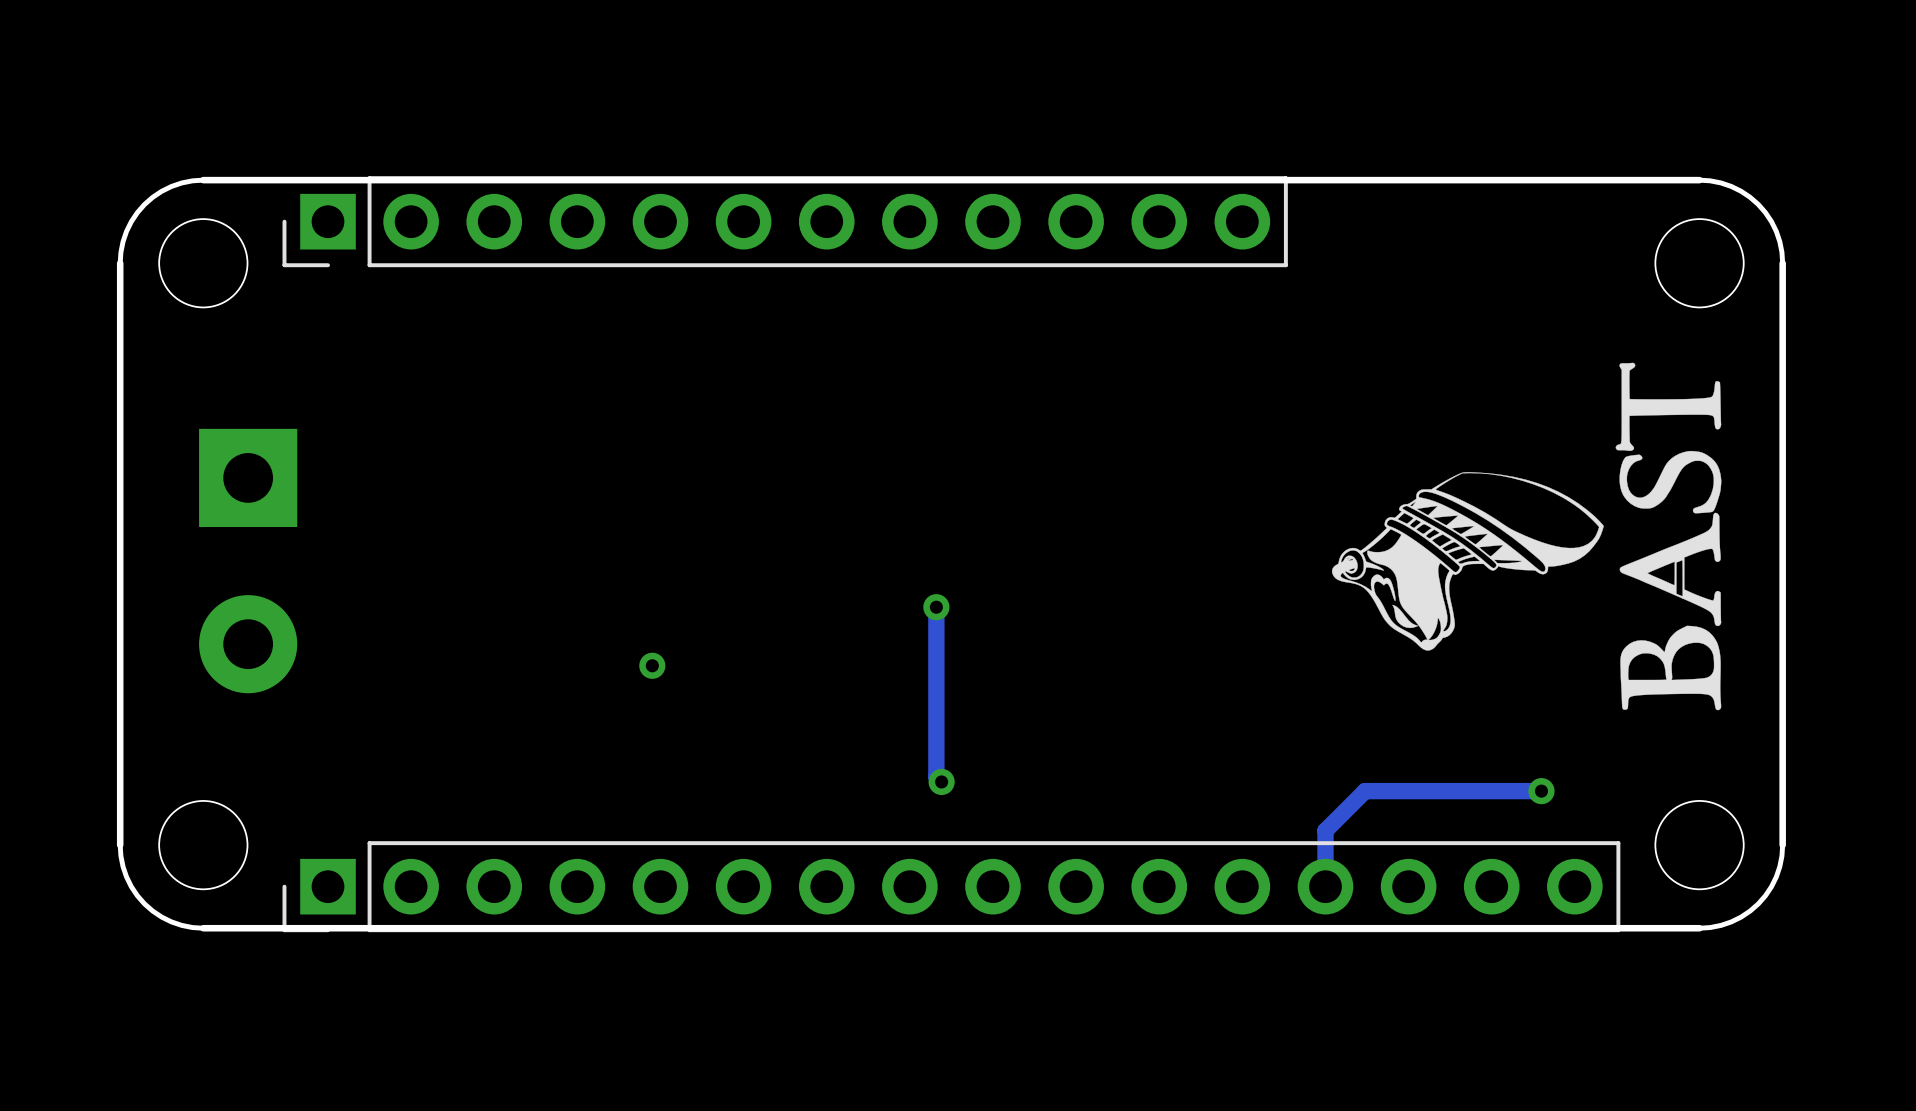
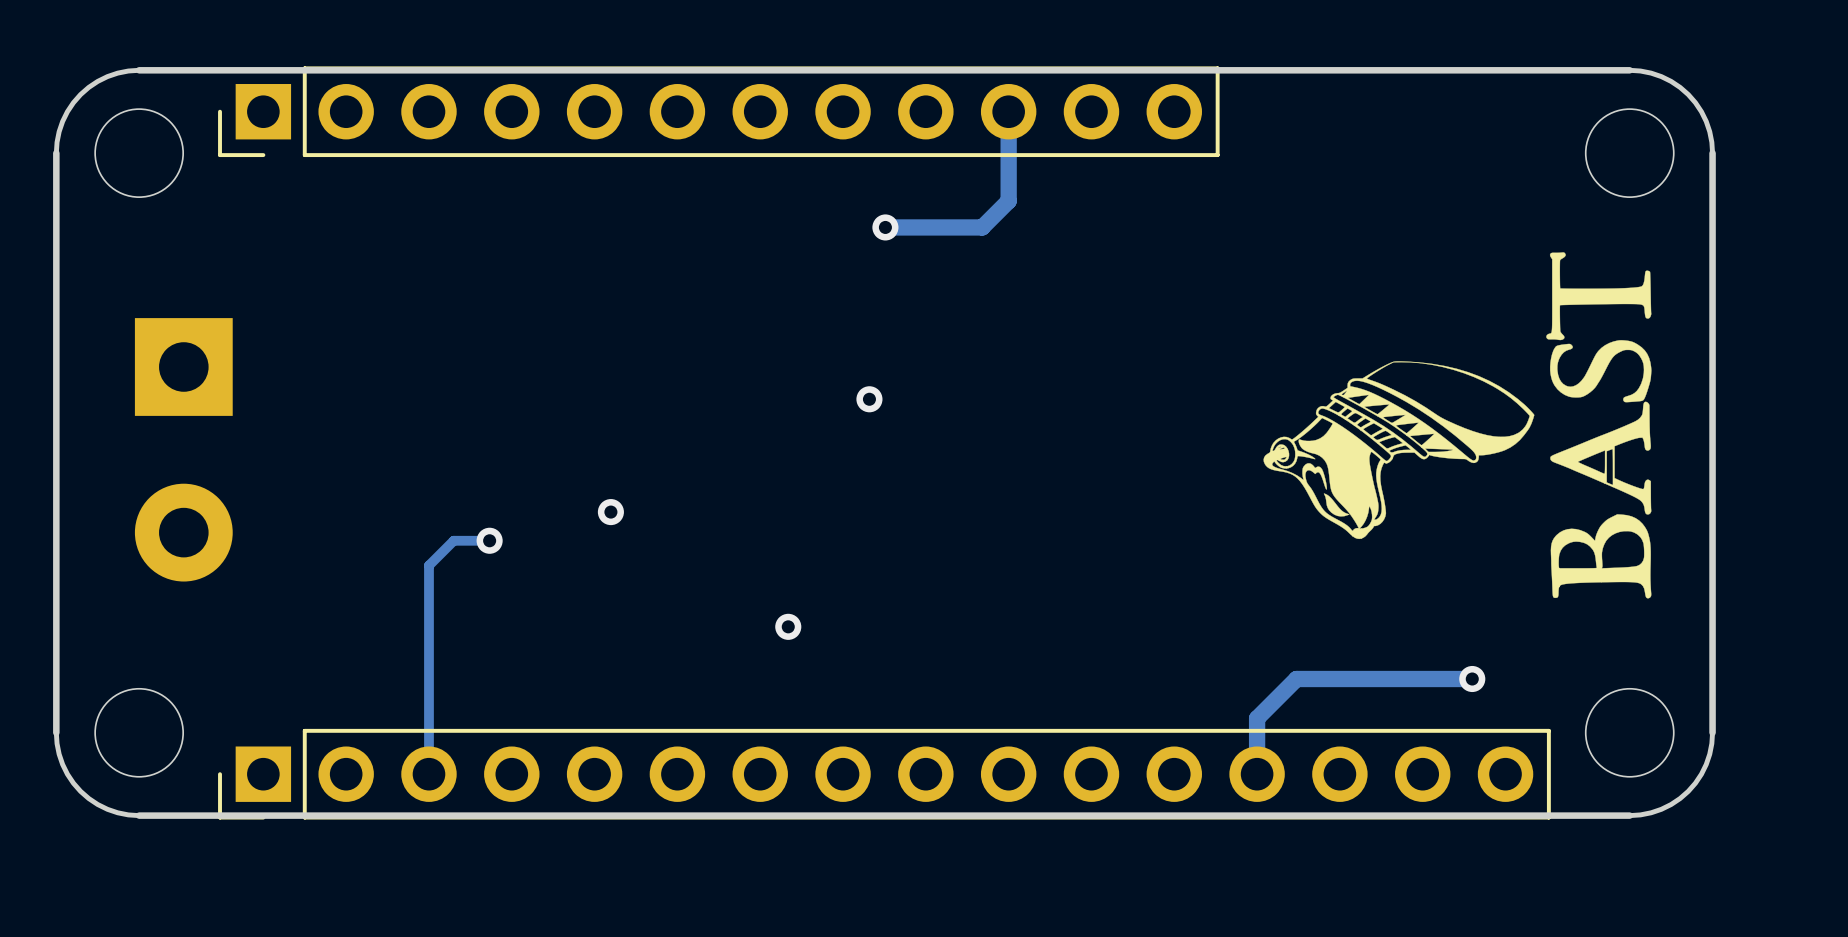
track: none -> (1008, 111) (1008, 201) (982, 227) (885, 227)
via: none -> (885, 227)
via: none -> (869, 399)
track: (936, 607) (936, 776) (941, 781) -> none
via: (936, 607) -> none
via: none -> (610, 512)
track: none -> (489, 540) (453, 540) (428, 565) (428, 774)
via: none -> (489, 540)
via: (652, 665) -> none
via: none -> (788, 626)
via: (941, 781) -> none

